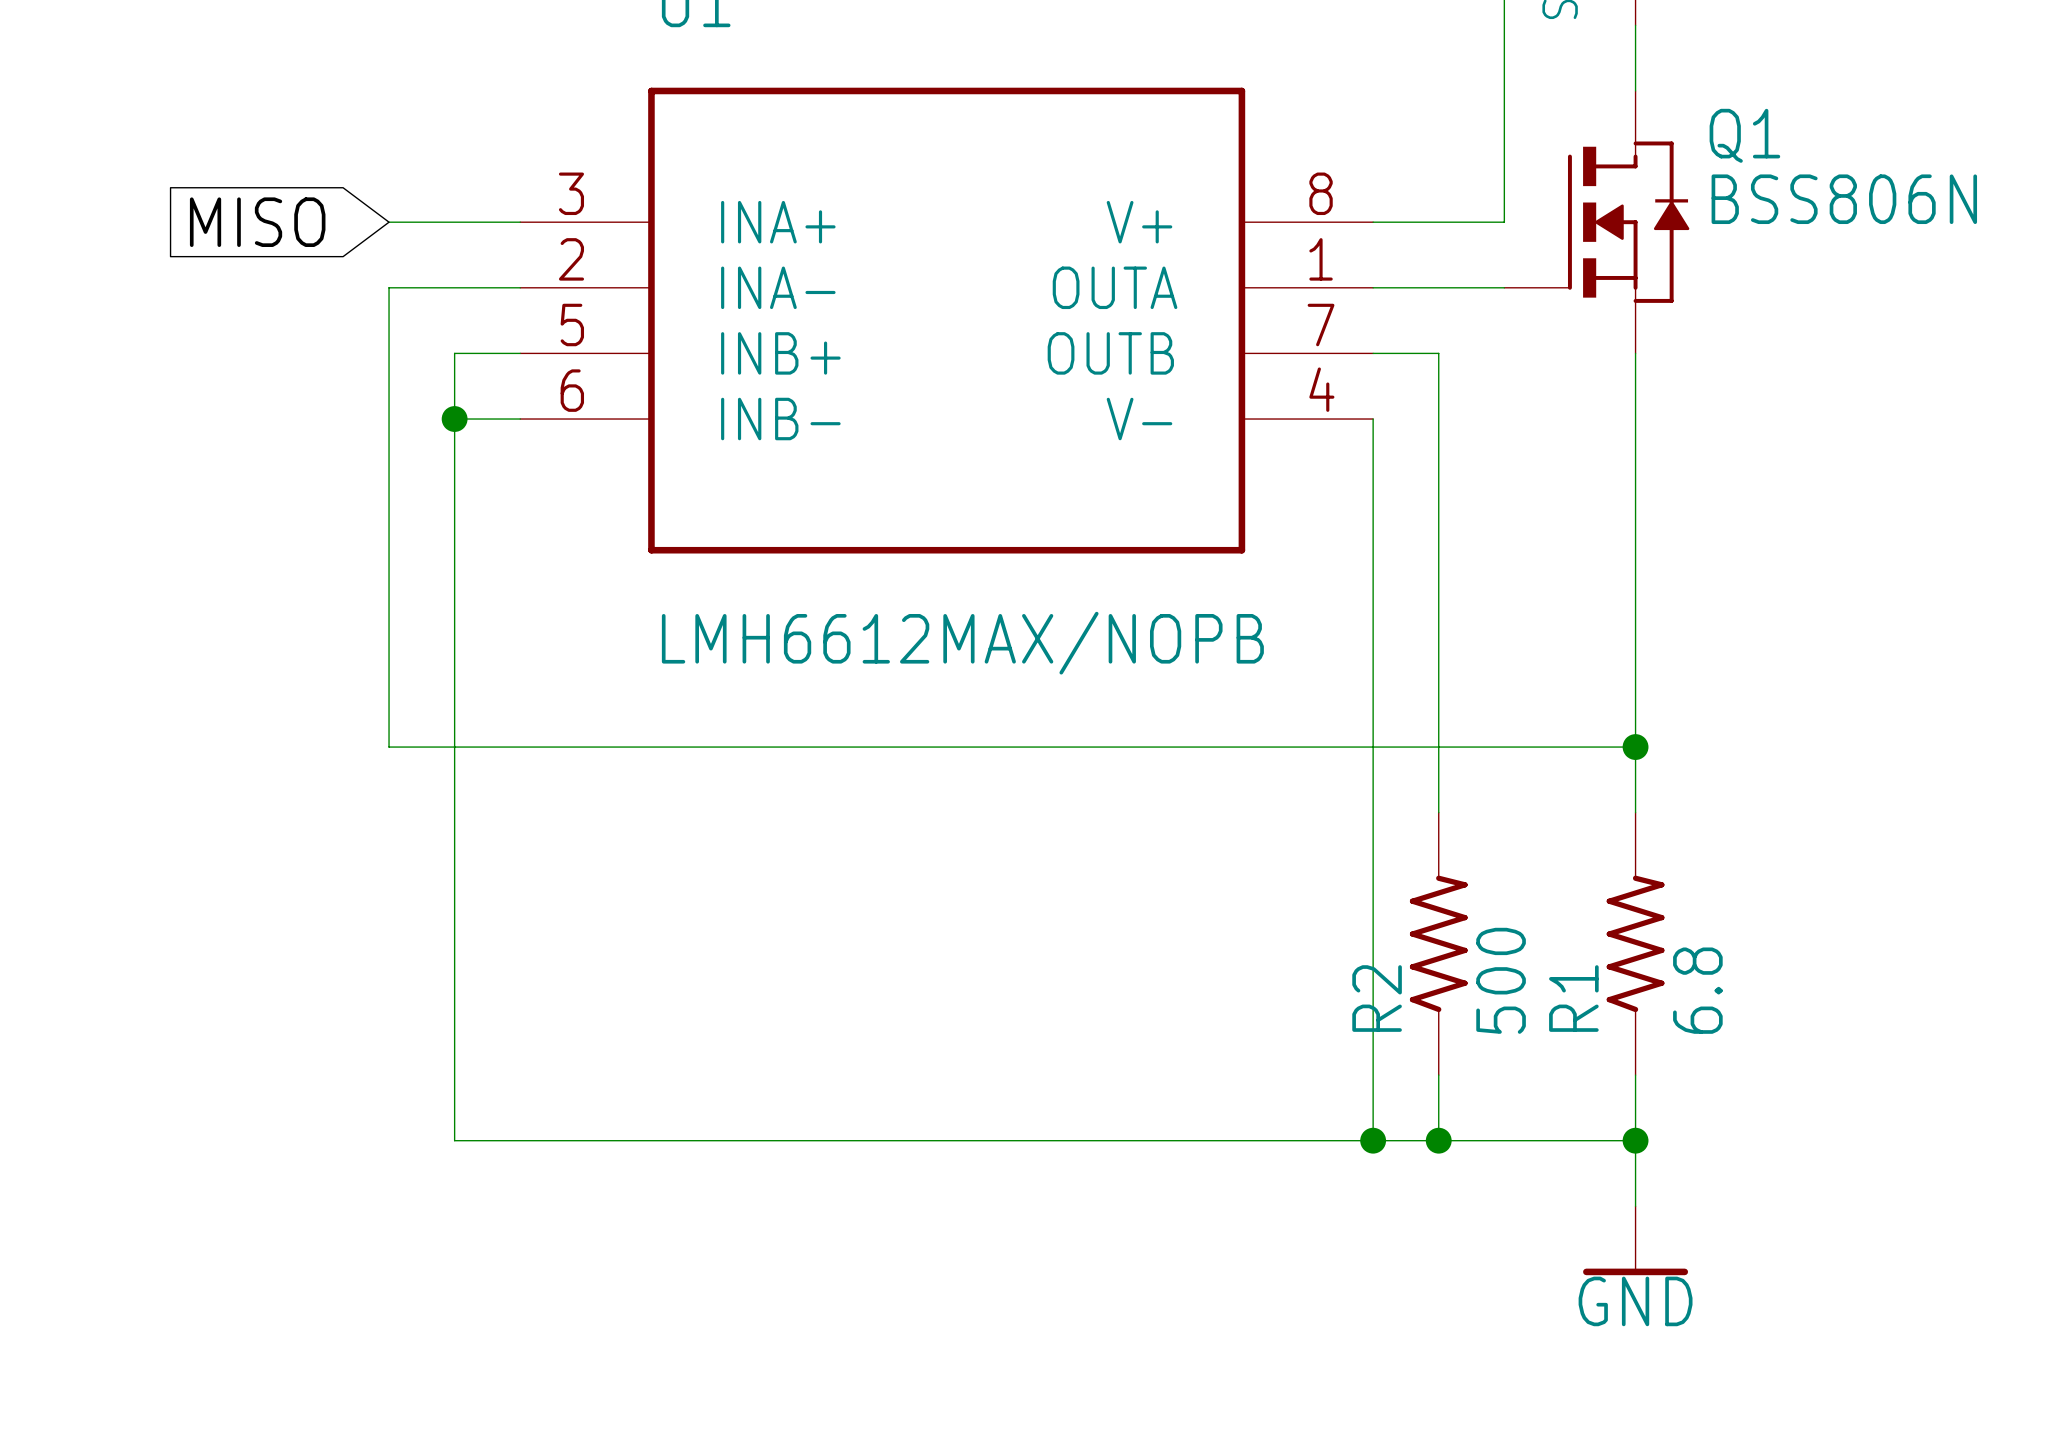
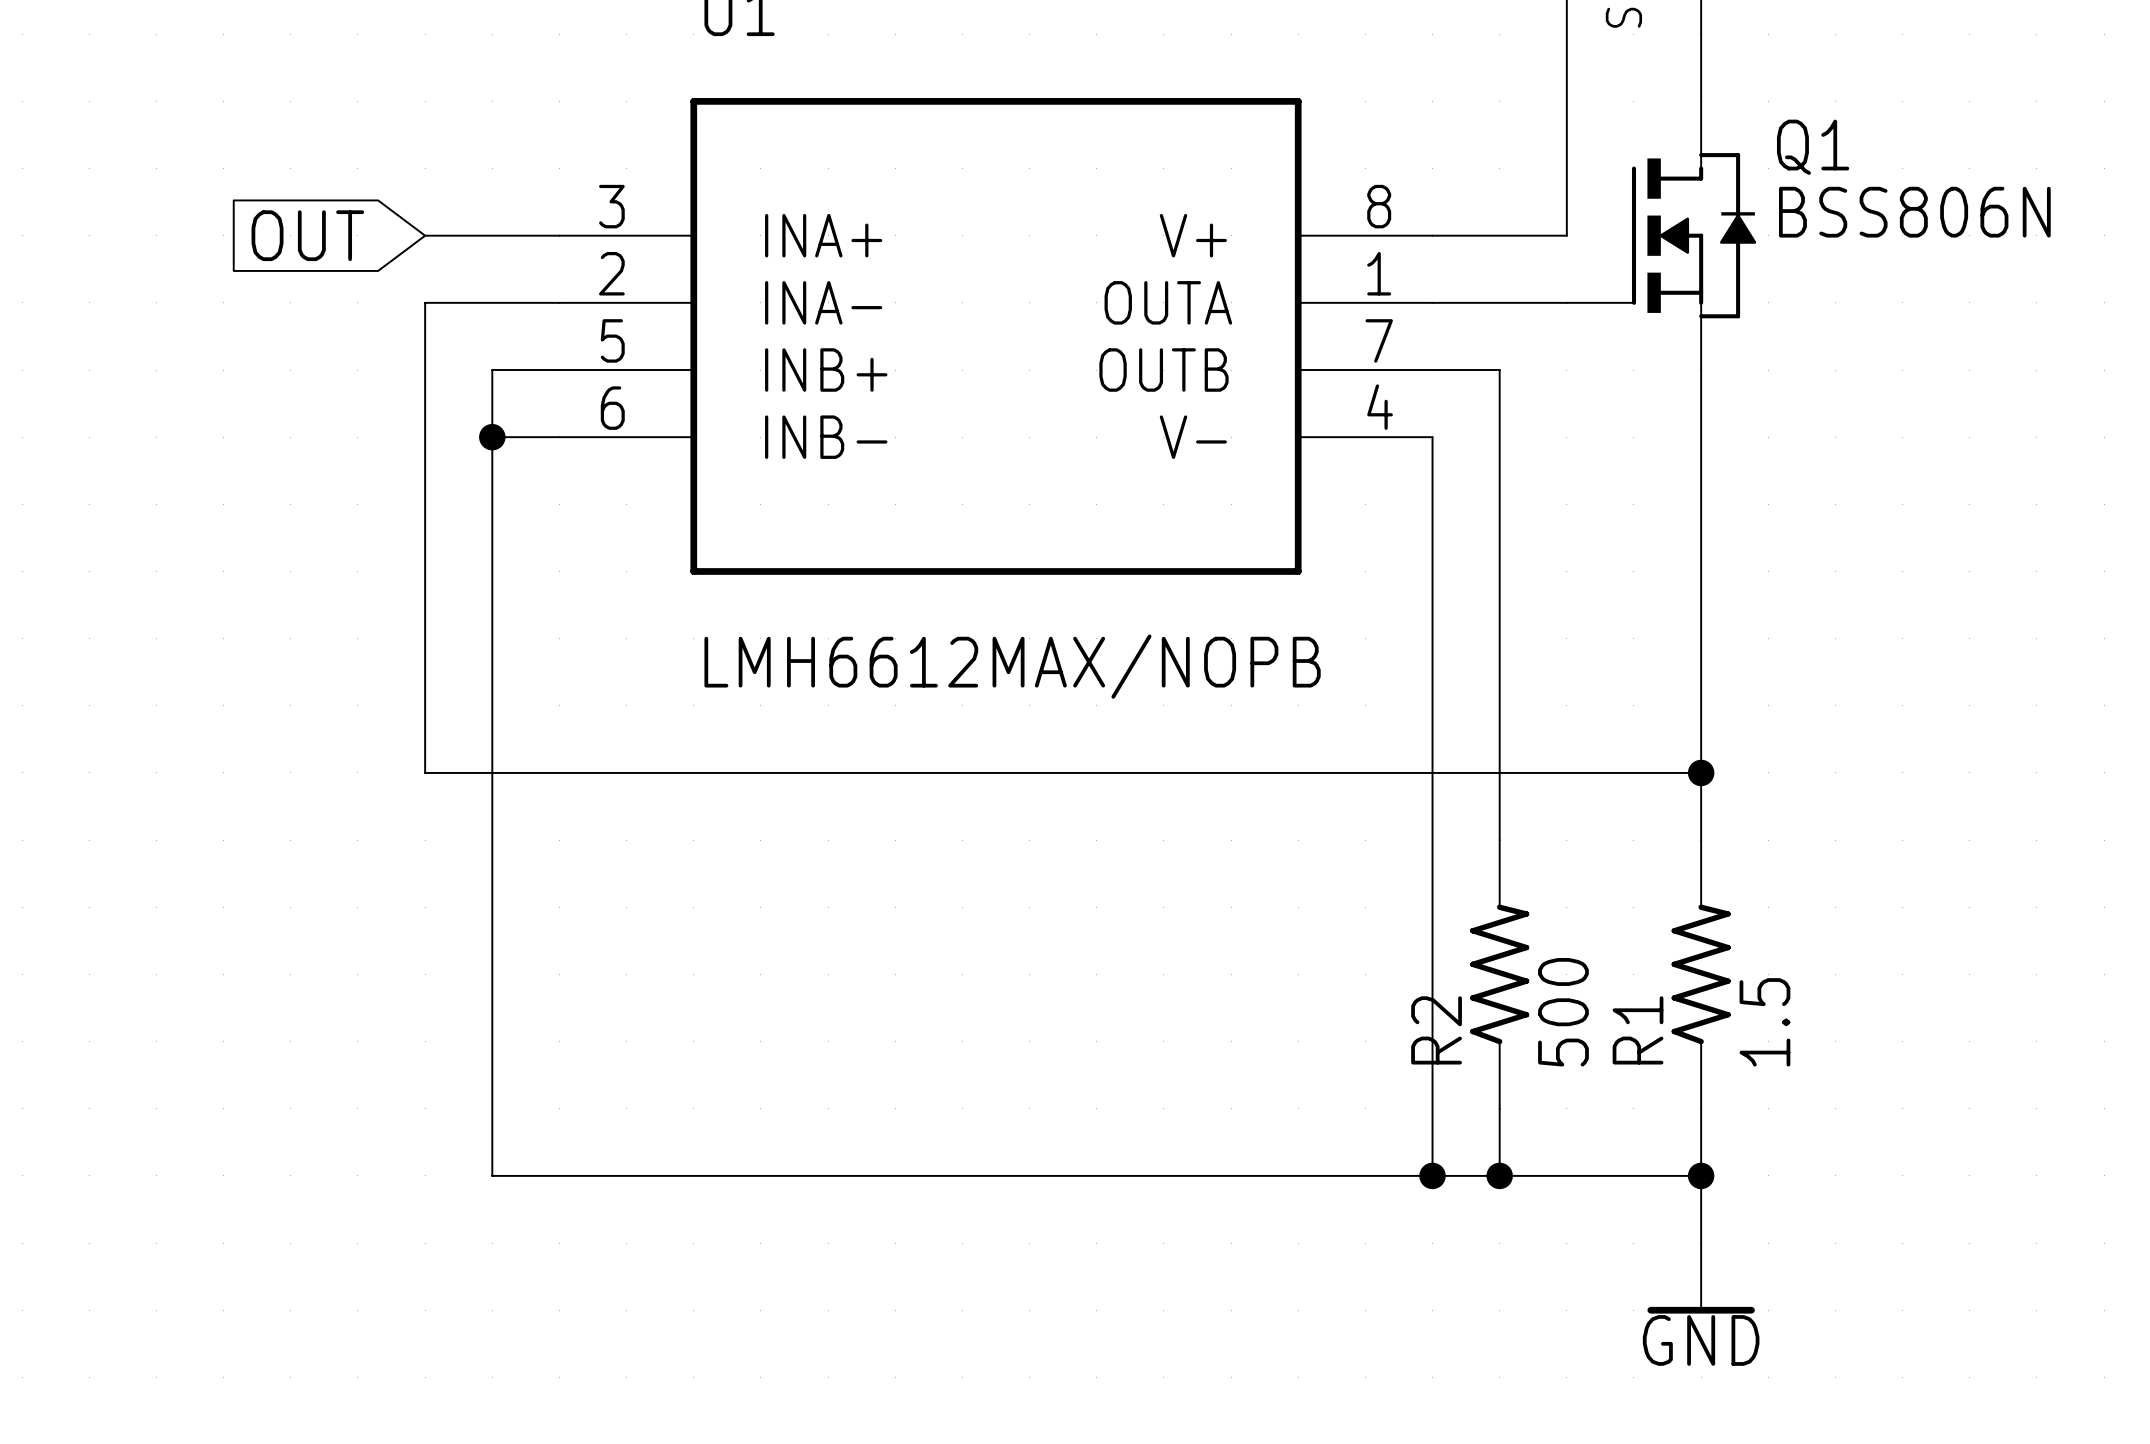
global label: MISO (257, 222) -> OUT (307, 235)
R1 value: 6.8 (1697, 990) -> 1.5 (1764, 1022)

